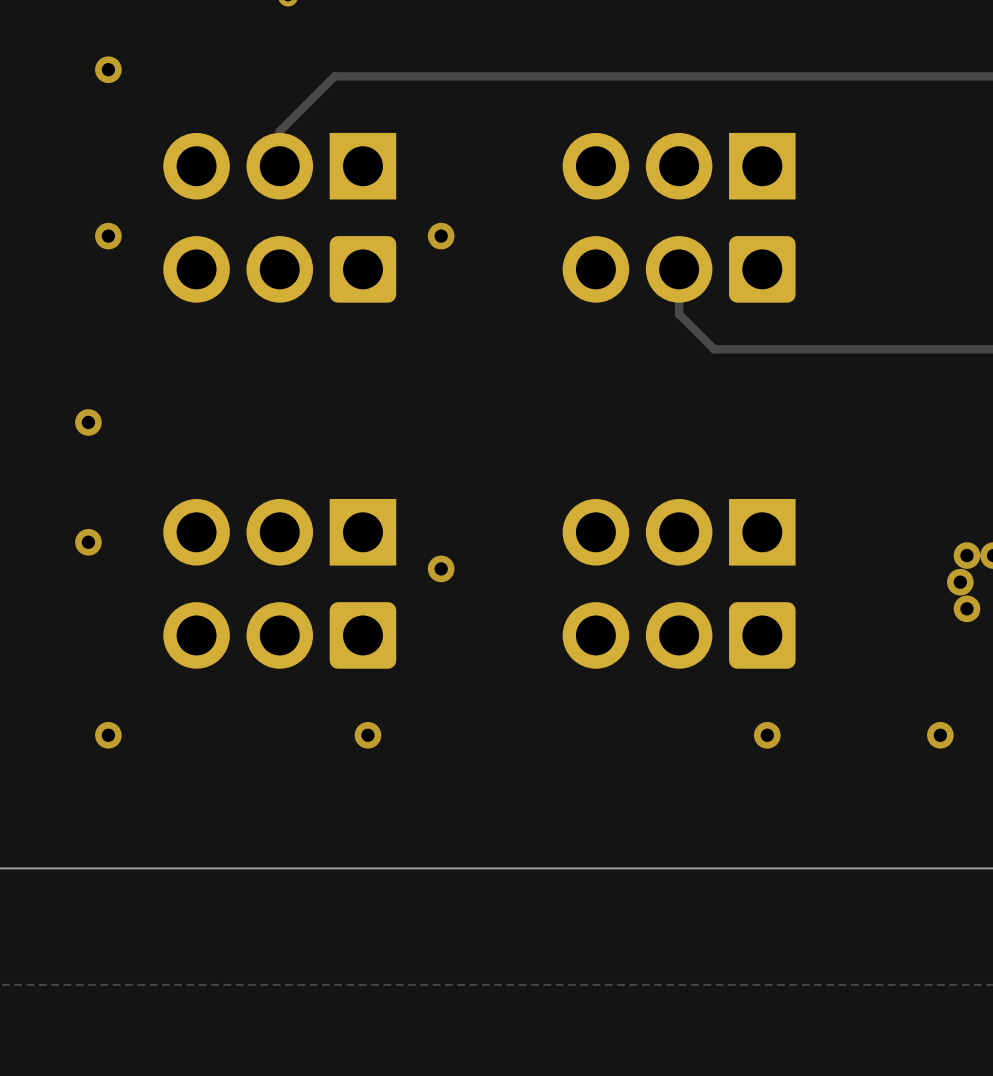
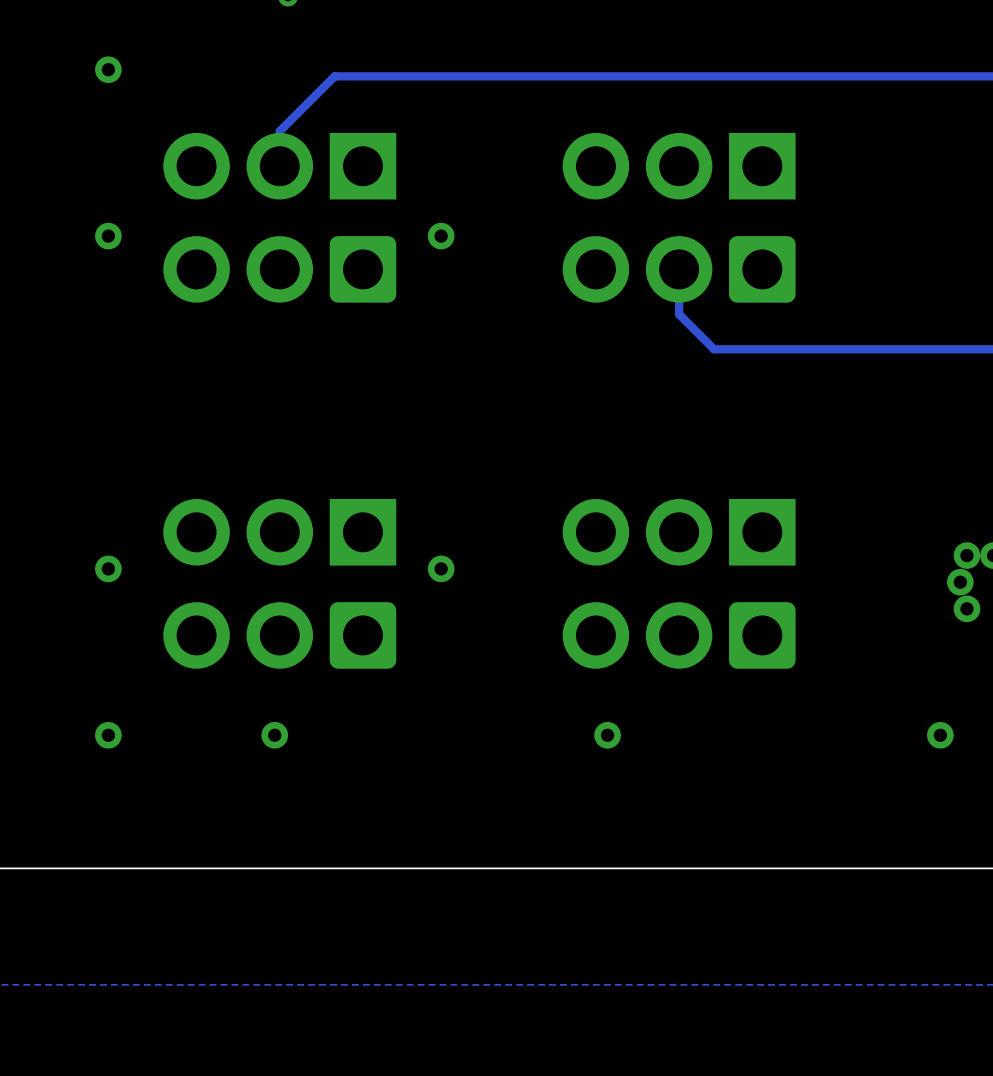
via: (88, 422) -> none
via position: (88, 542) -> (108, 568)
via position: (367, 735) -> (274, 735)
via: none -> (607, 735)
via: (767, 735) -> none

